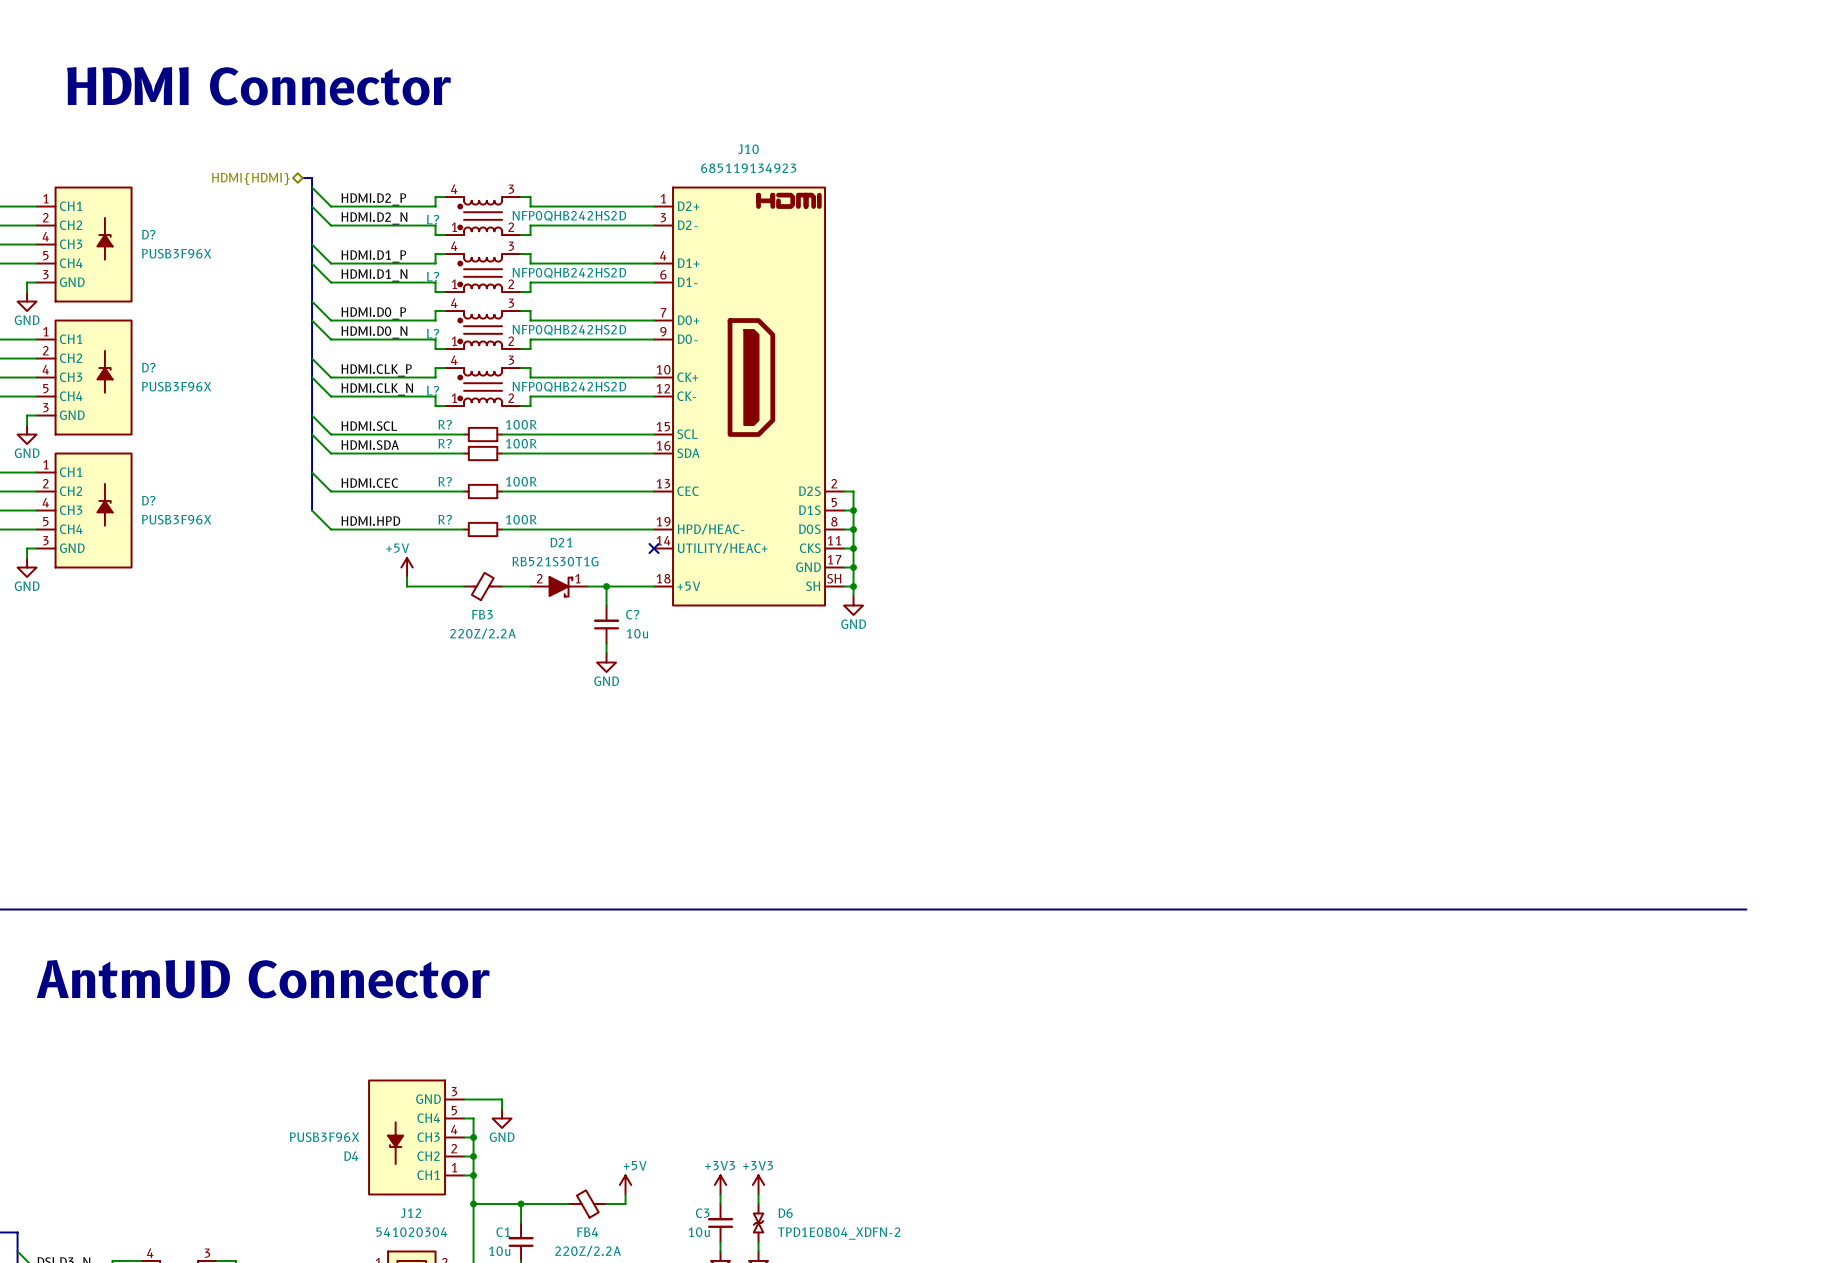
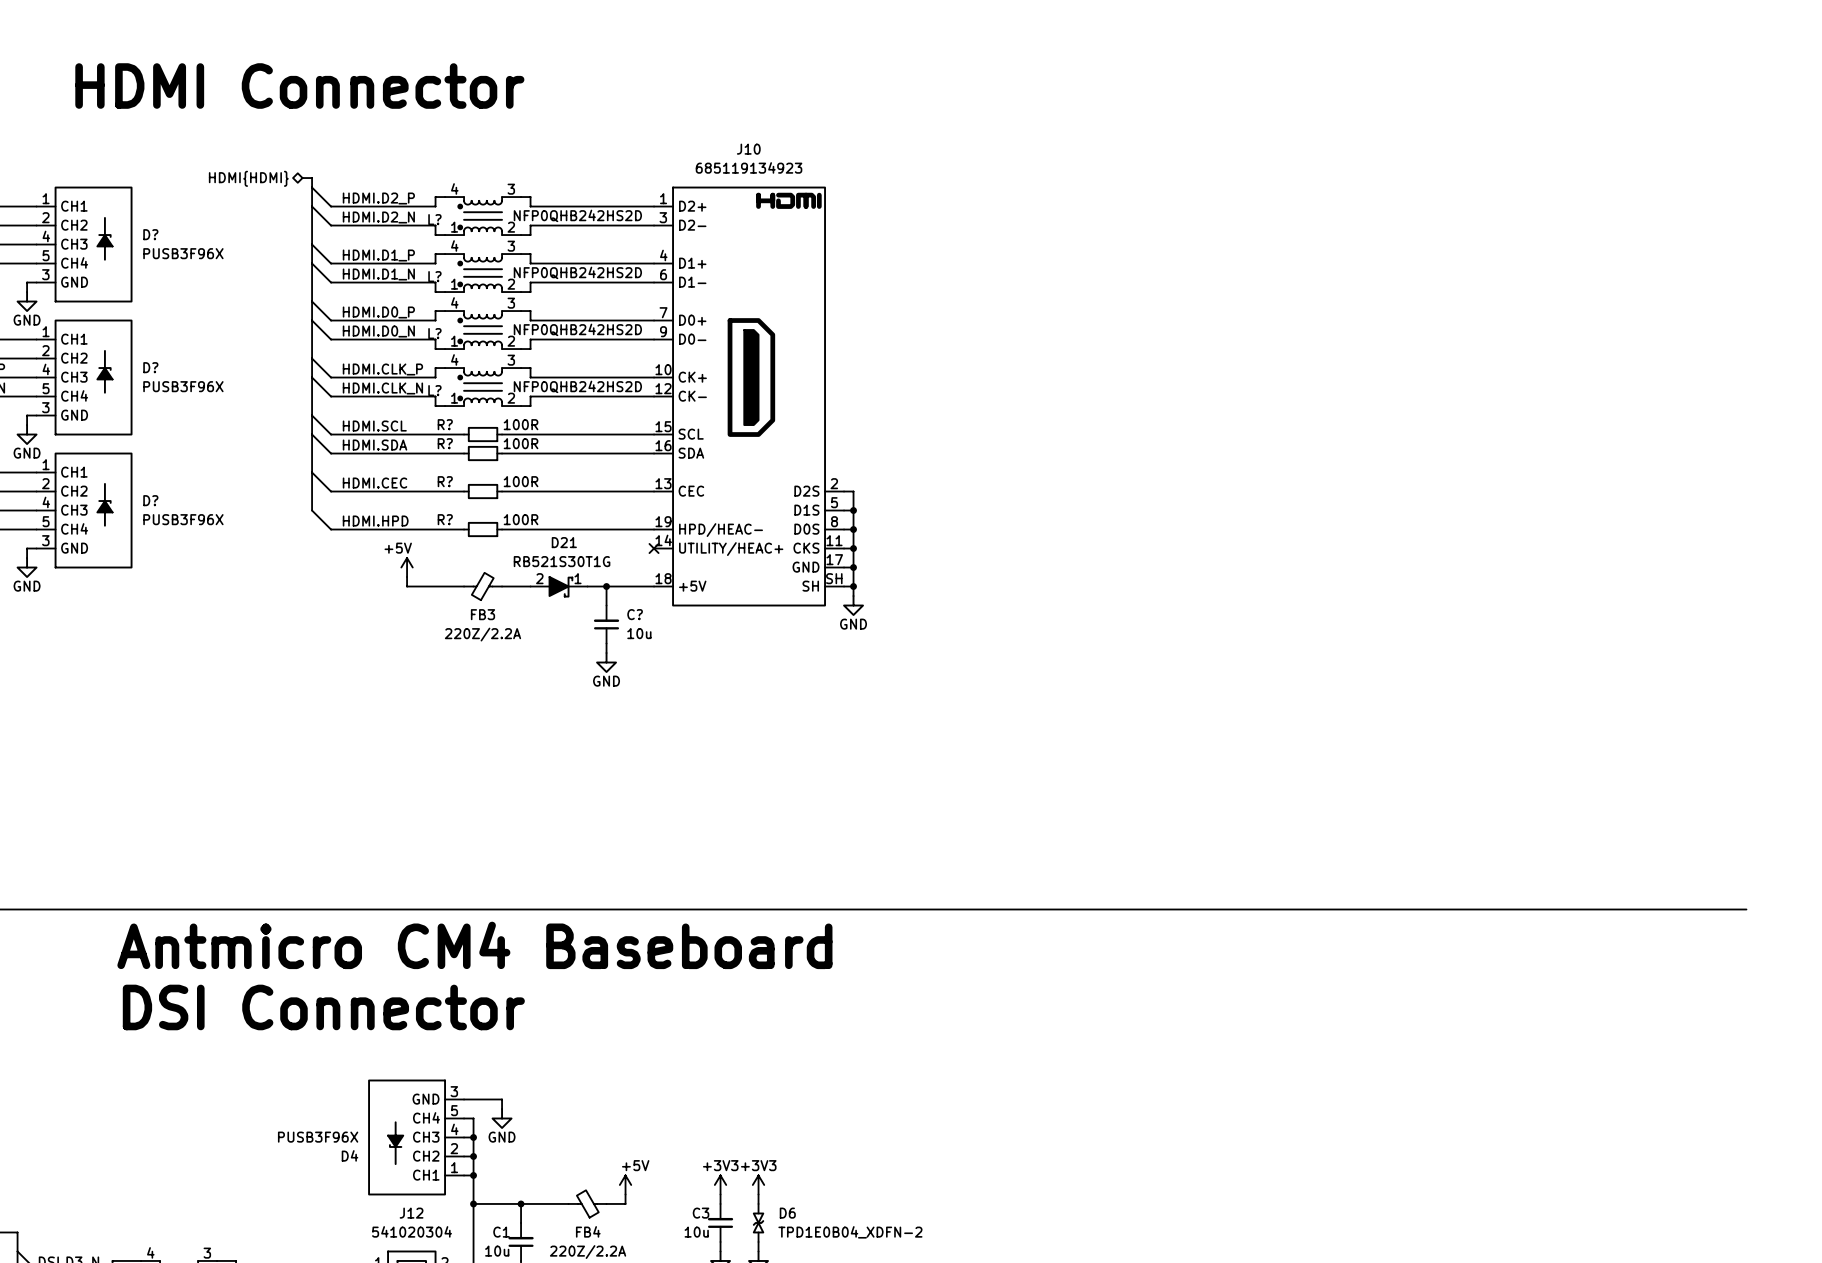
text: none -> Antmicro CM4 Baseboard (474, 945)
text: AntmUD Connector (263, 979) -> DSI Connector (323, 1007)

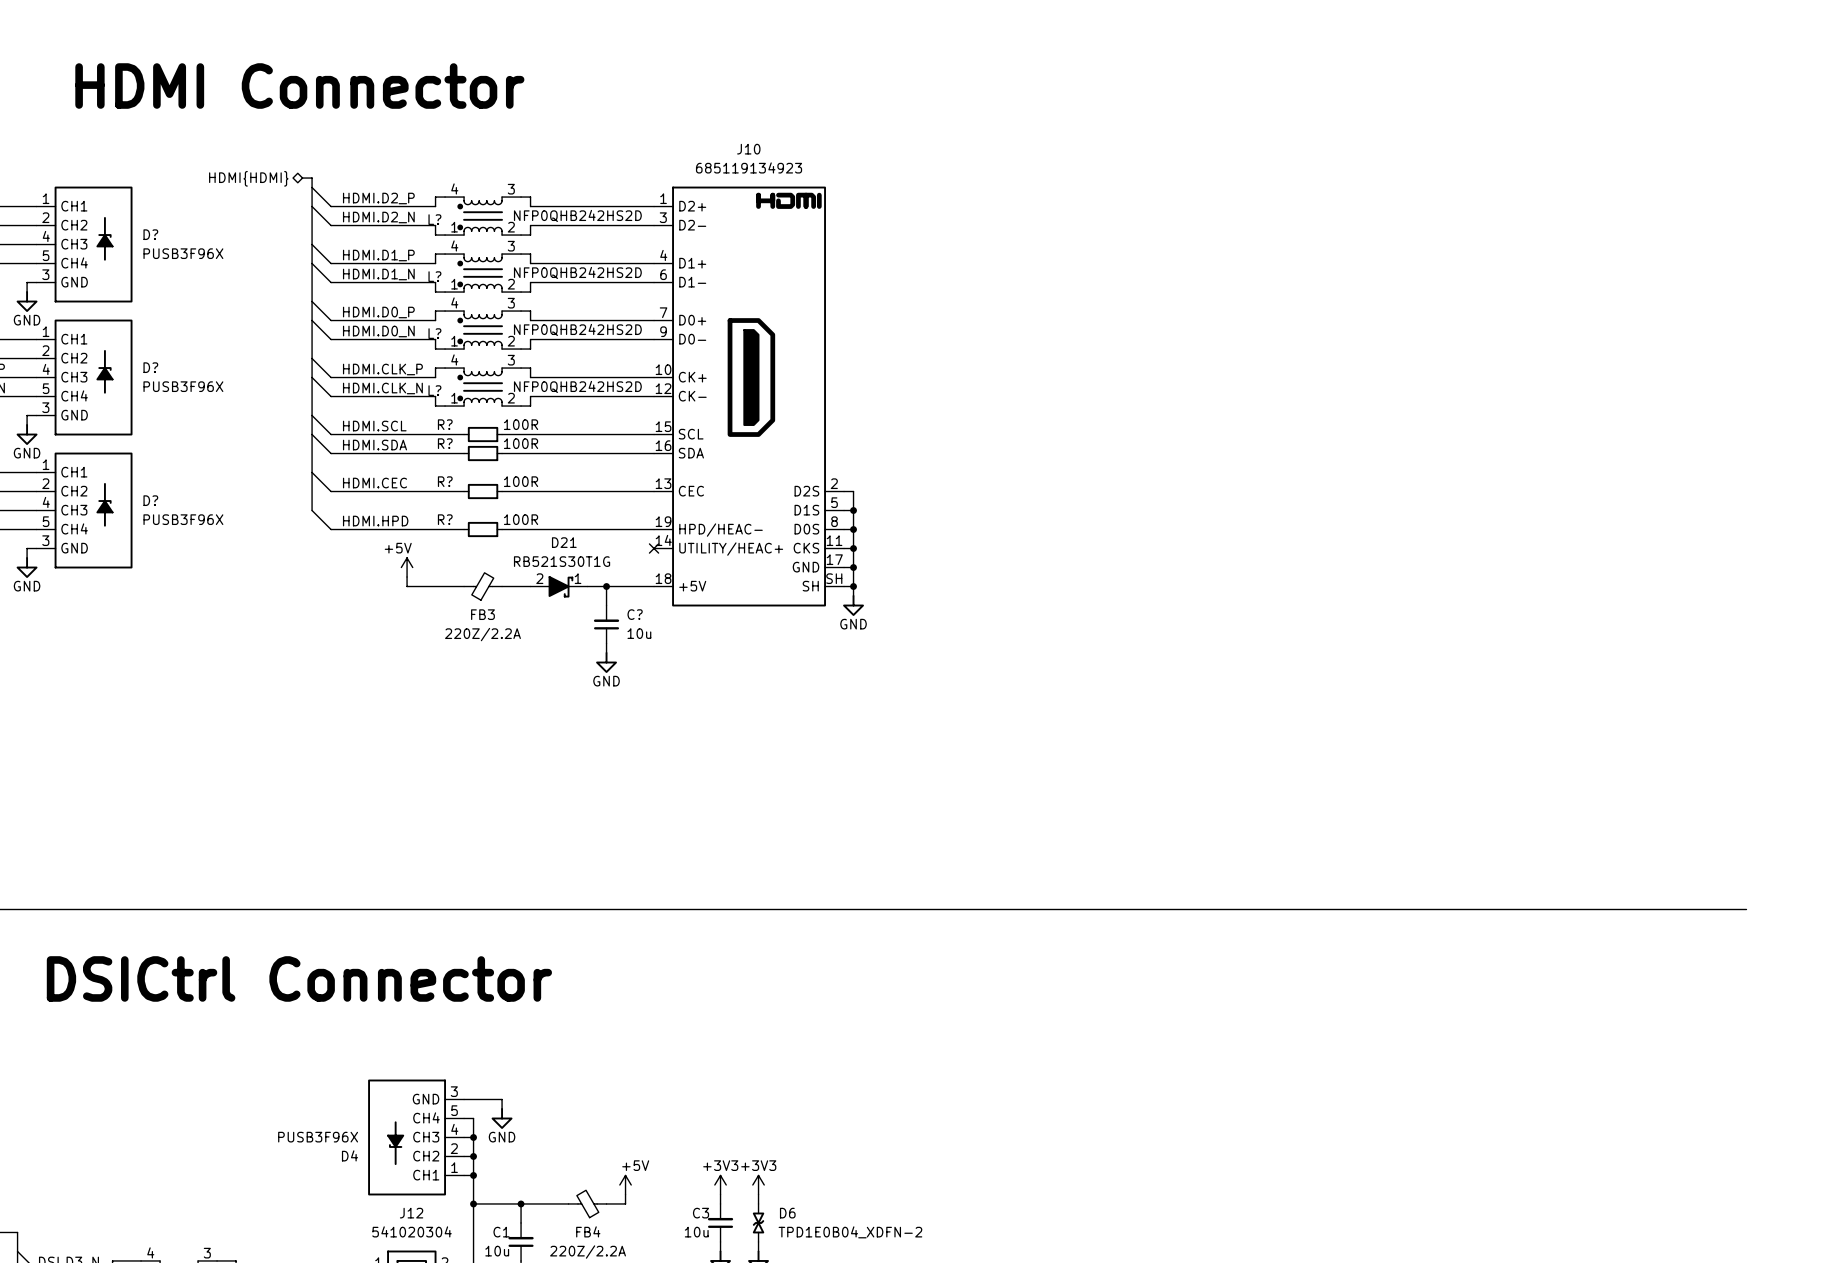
text: Antmicro CM4 Baseboard (474, 945) -> none
text: DSI Connector (323, 1007) -> DSICtrl Connector (299, 978)

